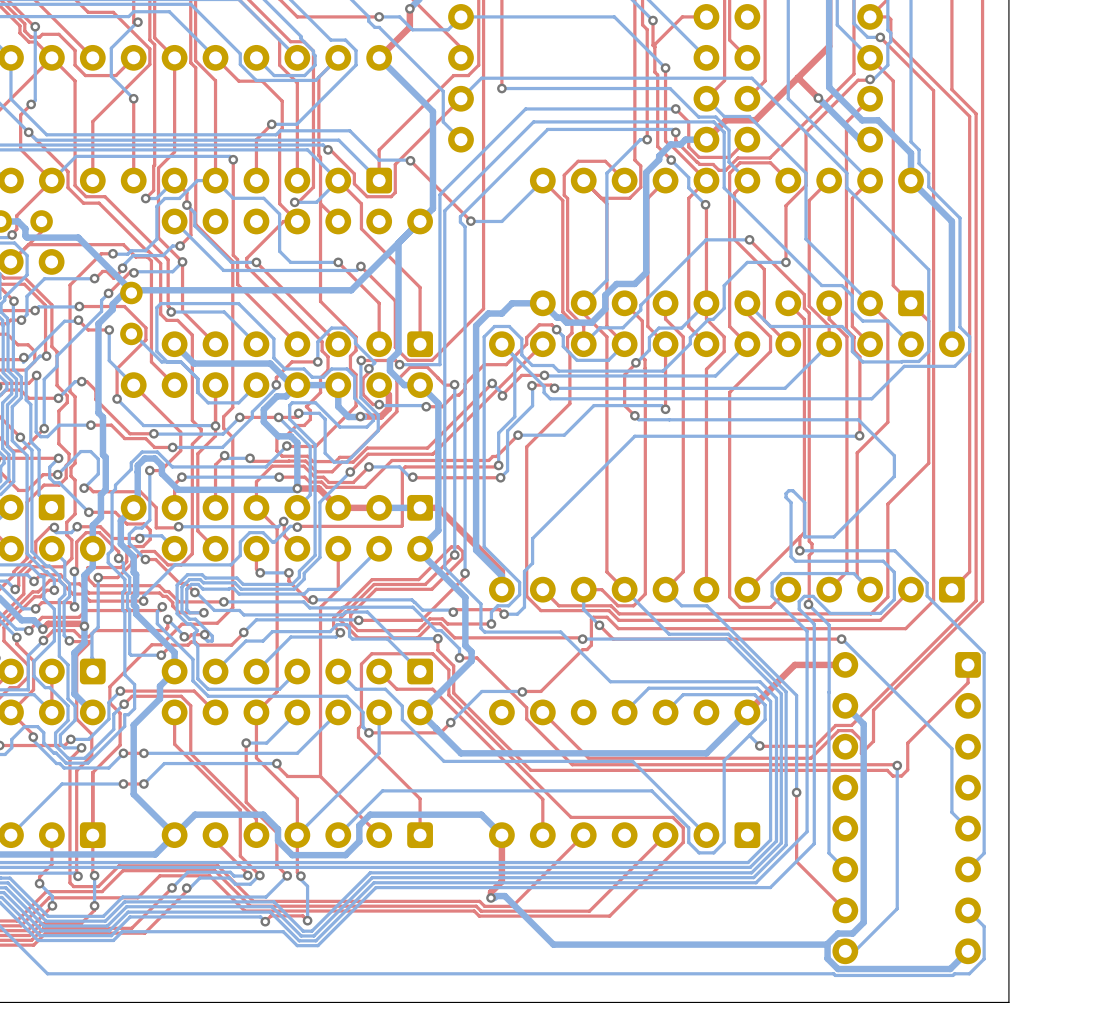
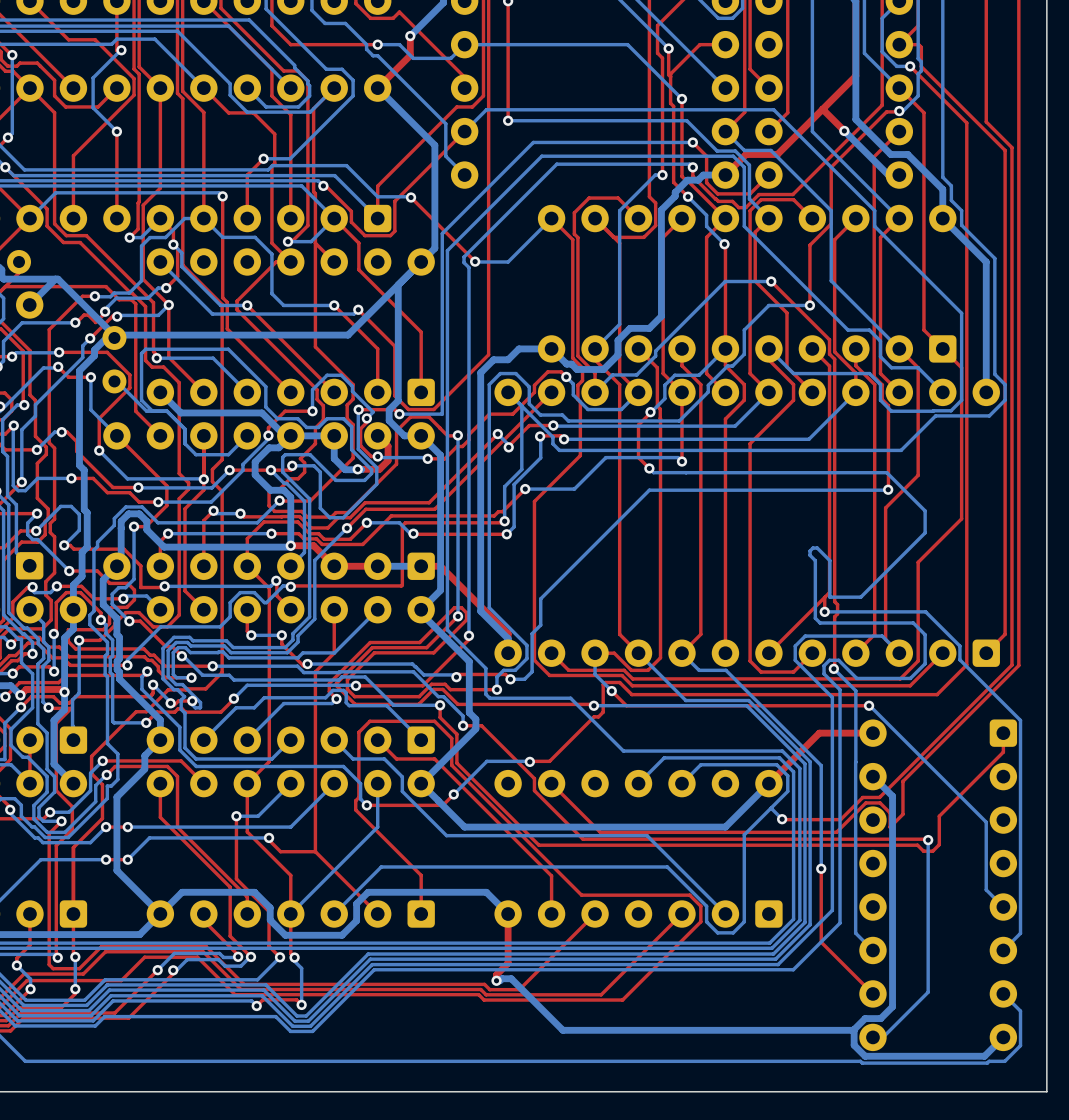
bottom track: none -> (55, 279) (29, 304)

